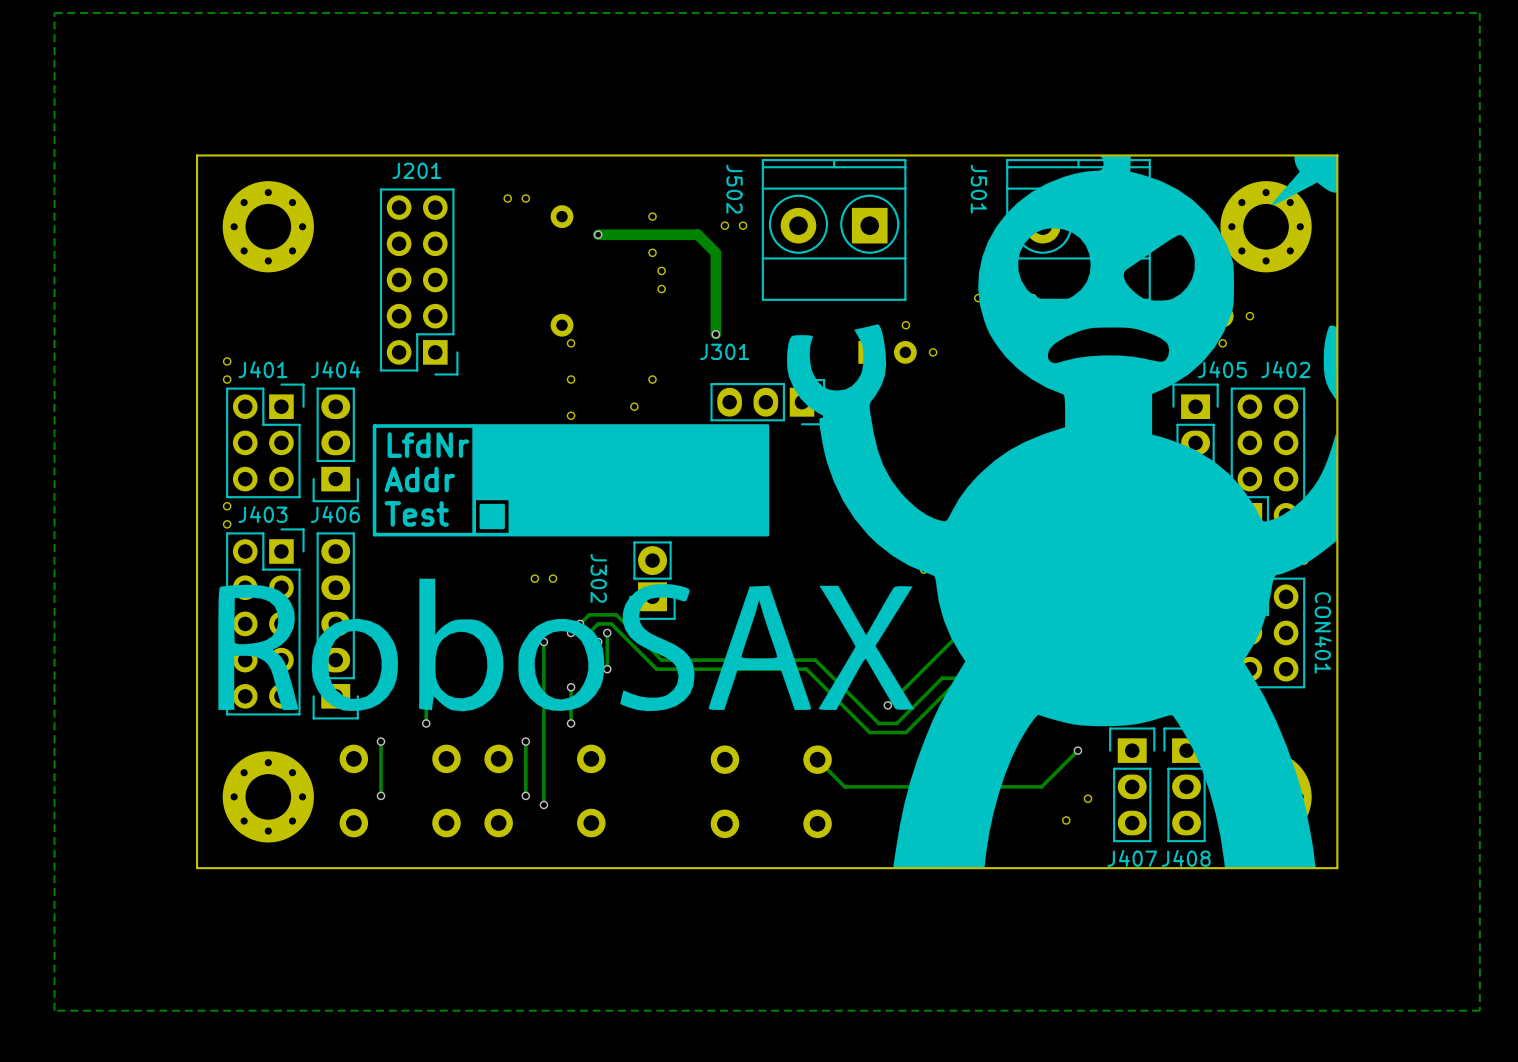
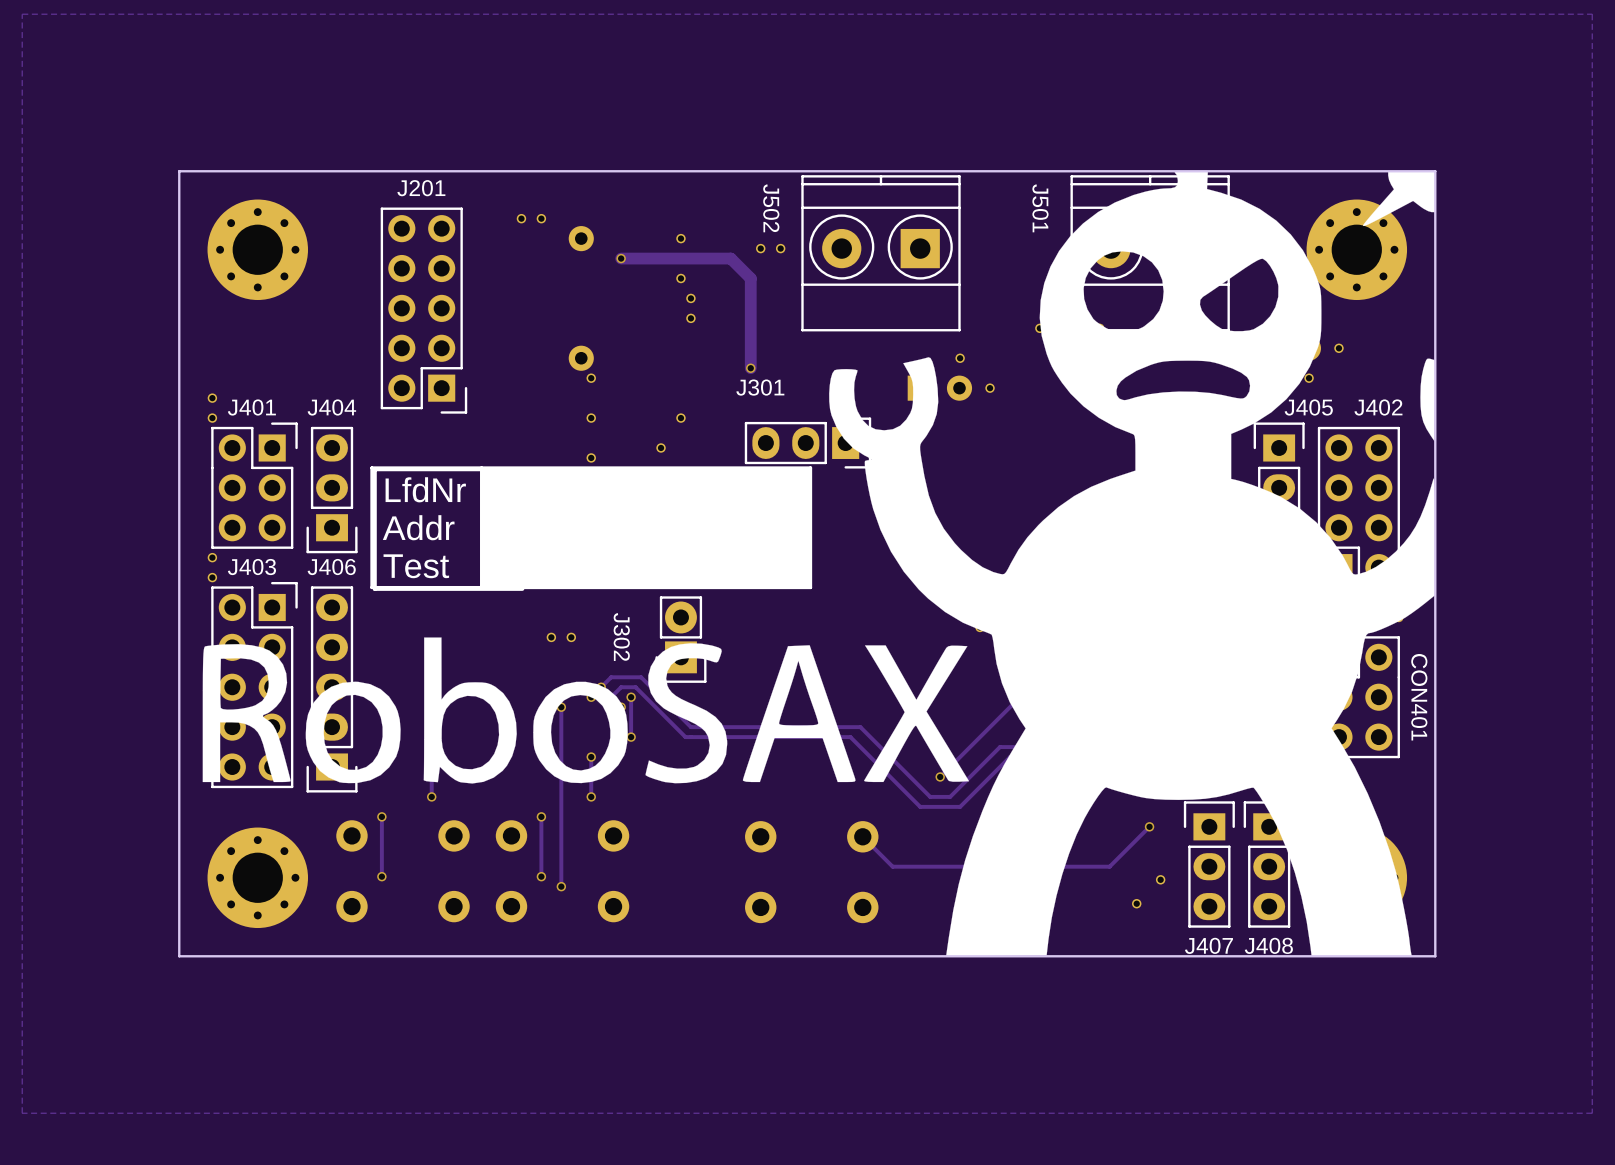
line: none -> (481, 467) (481, 587)
drawing shape: [472, 424, 770, 537] -> [481, 467, 811, 588]
line: none -> (810, 467) (810, 587) (371, 587) (371, 467) (810, 467)
drawing: [479, 503, 505, 530] -> none

